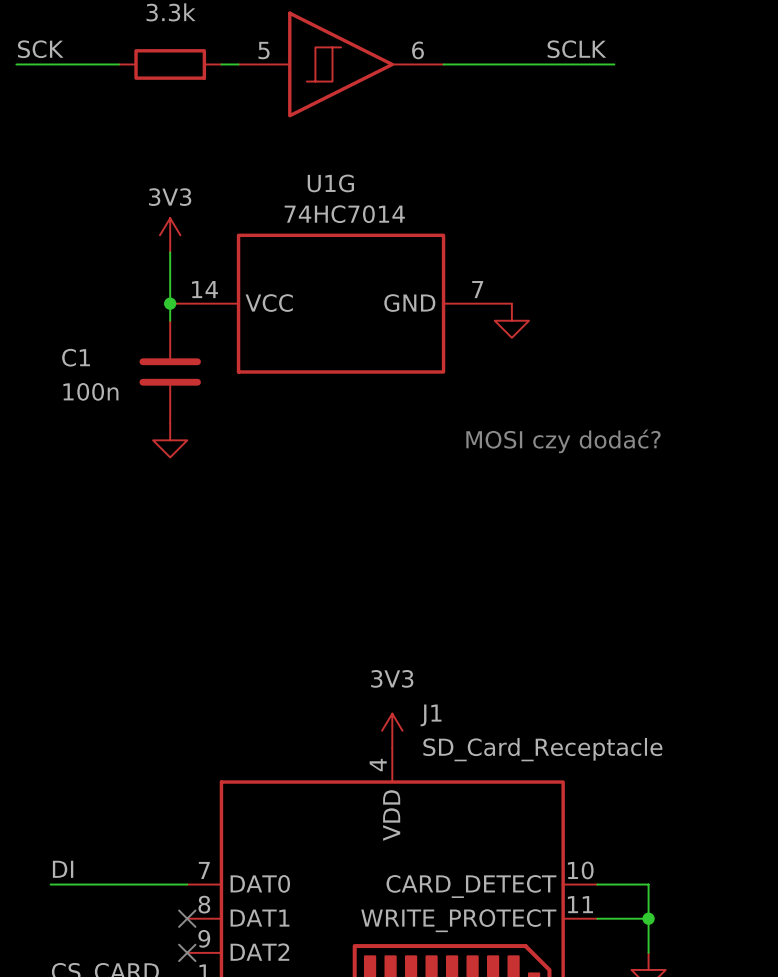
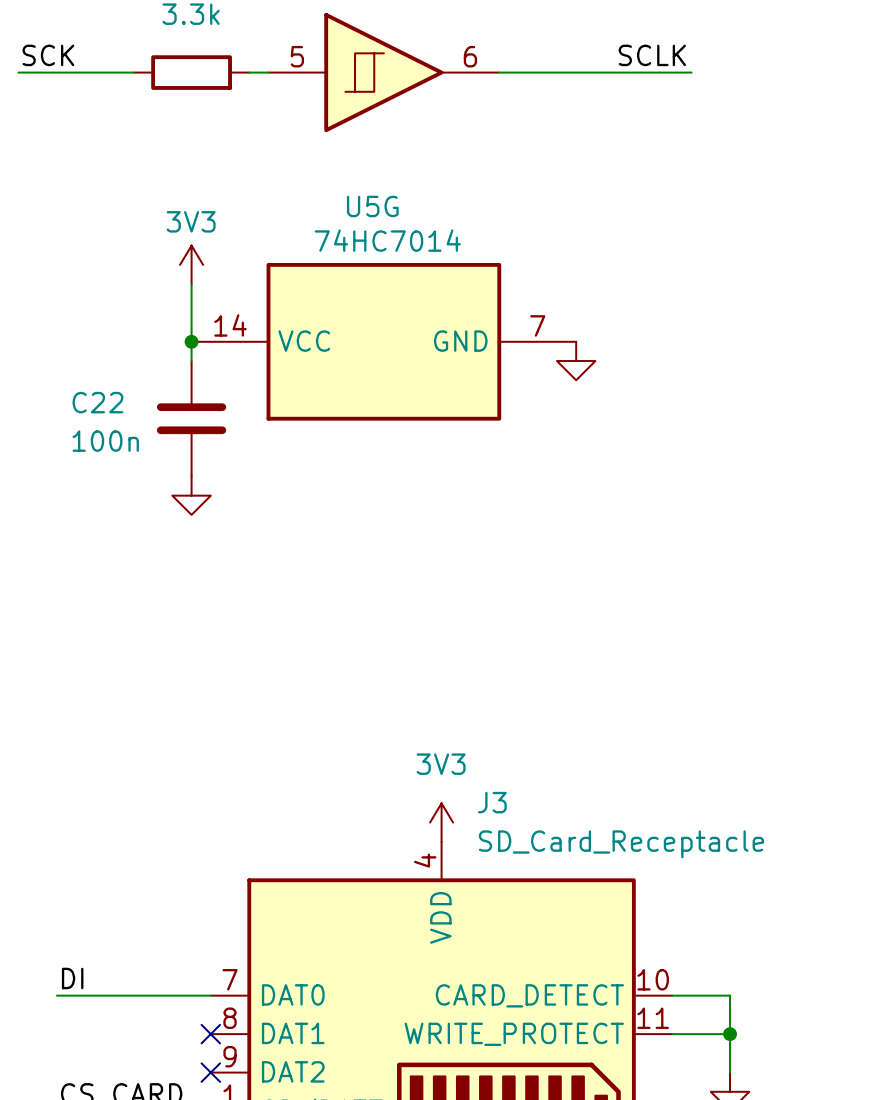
U1G name: U1G (330, 183) -> U5G (372, 206)
C1 name: C1 (76, 357) -> C22 (97, 402)
text: MOSI czy dodać? (563, 441) -> none
J1 name: J1 (431, 715) -> J3 (492, 802)

